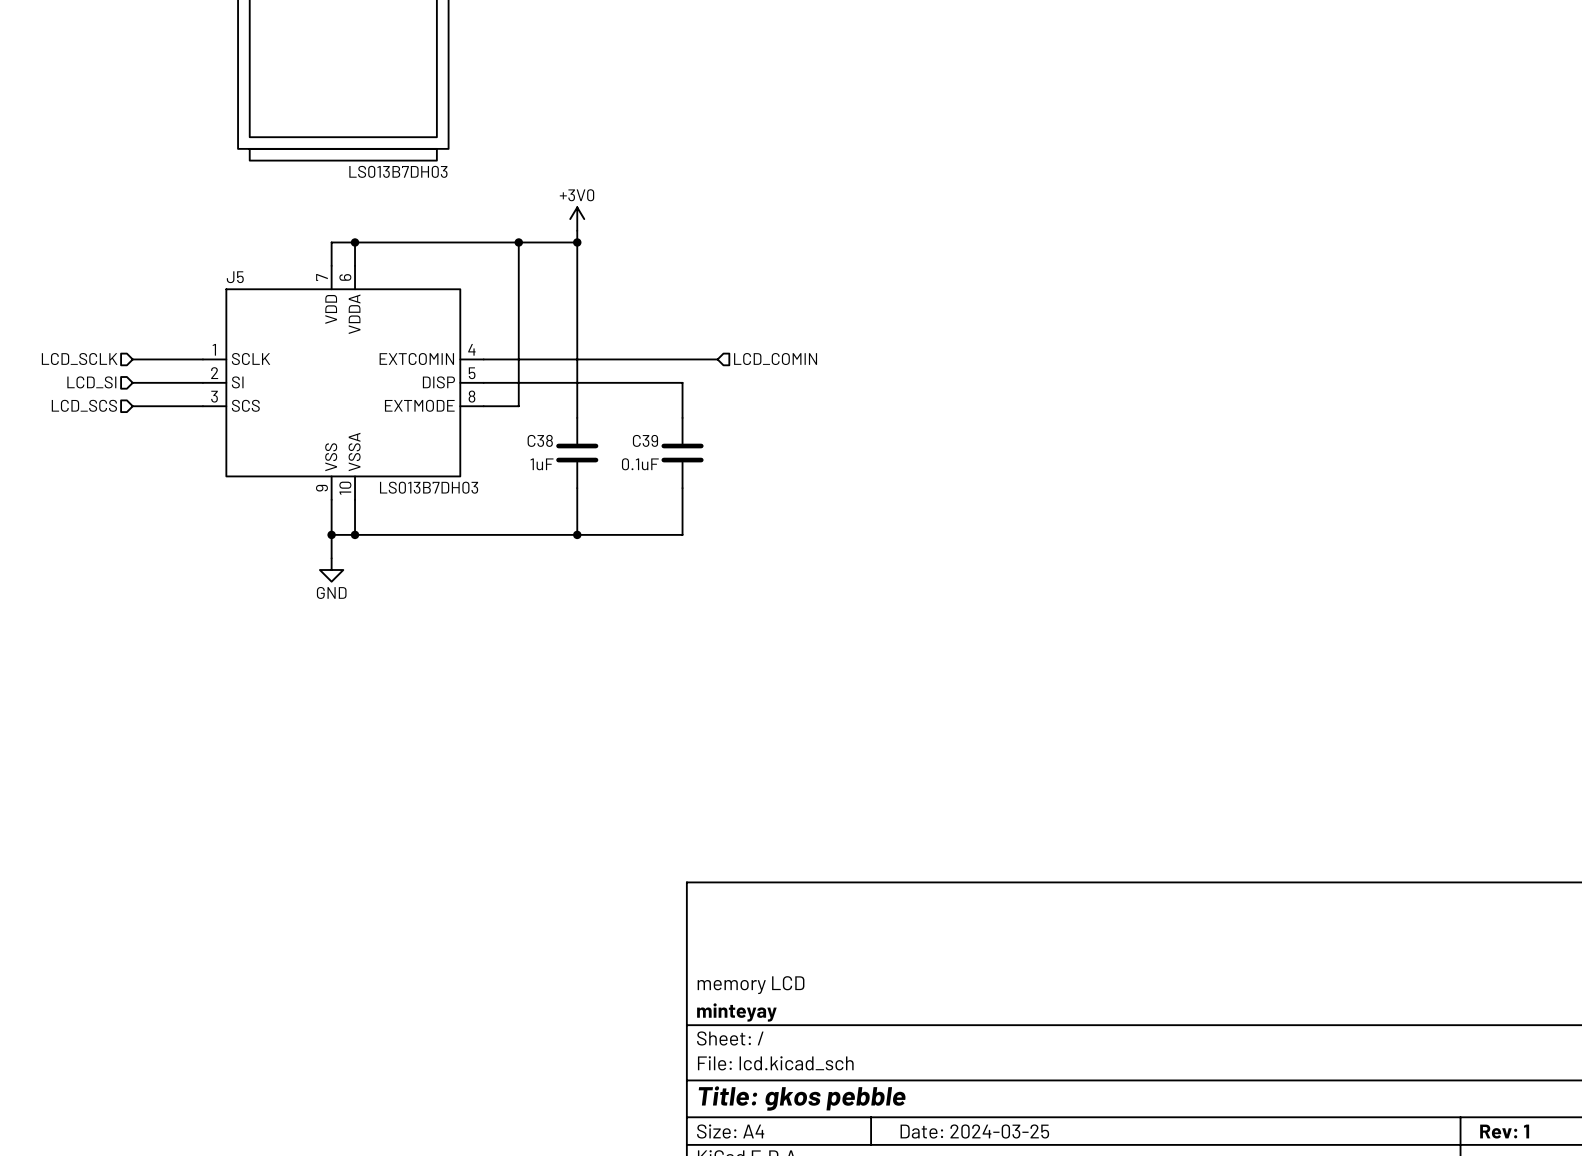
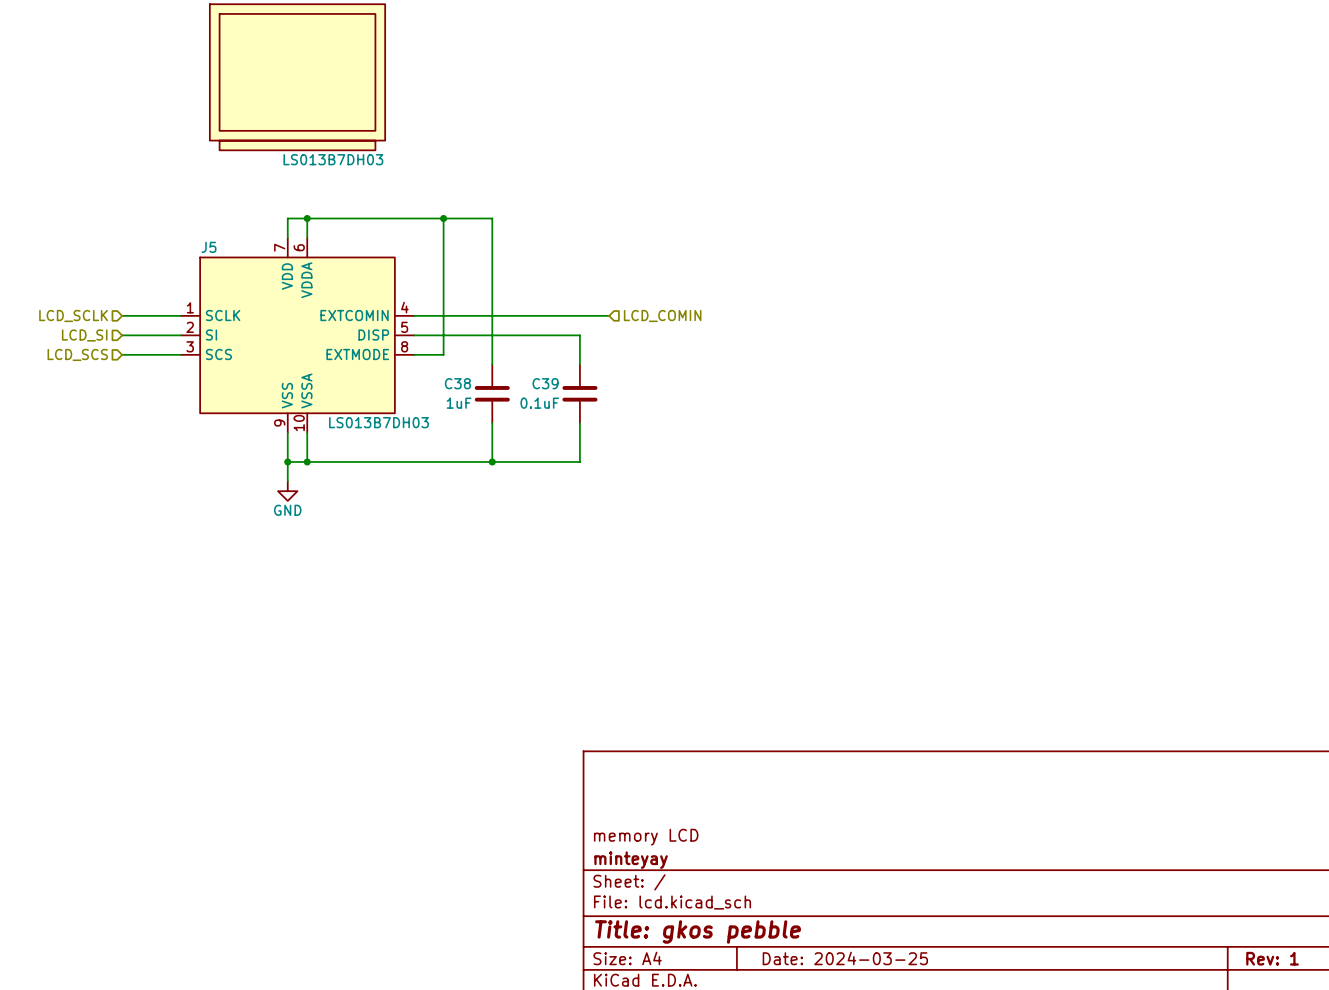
power symbol: +3V0 (577, 219) -> none
wire: (577, 230) (577, 242) -> none
junction: (577, 242) -> none

